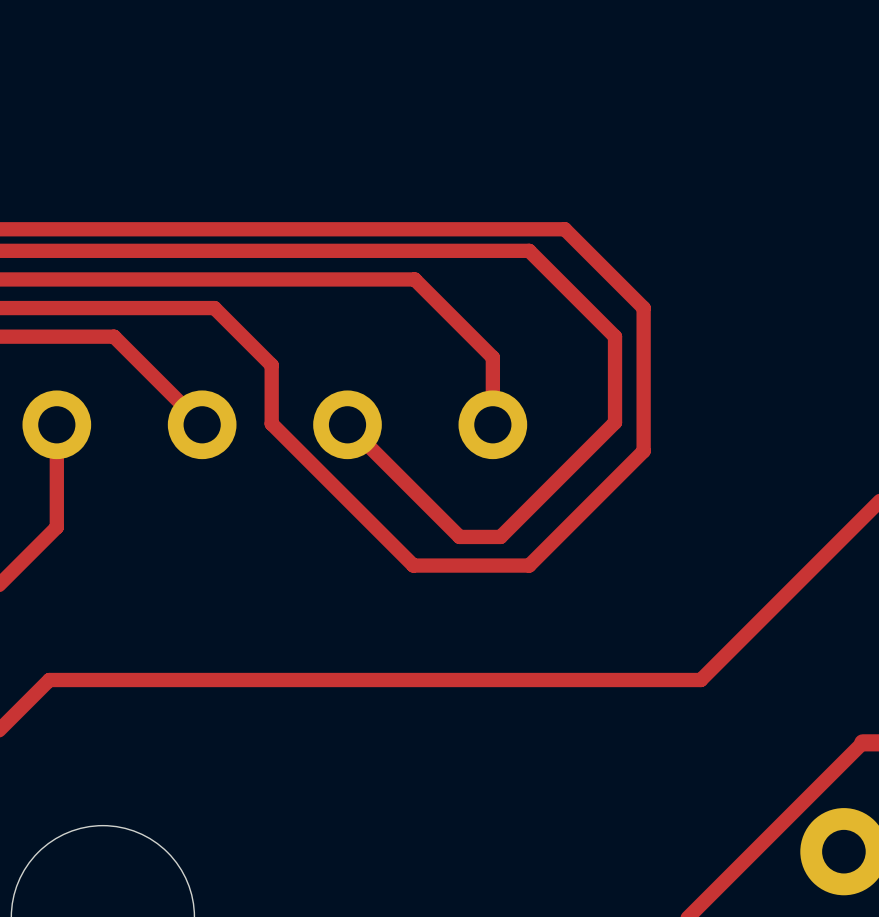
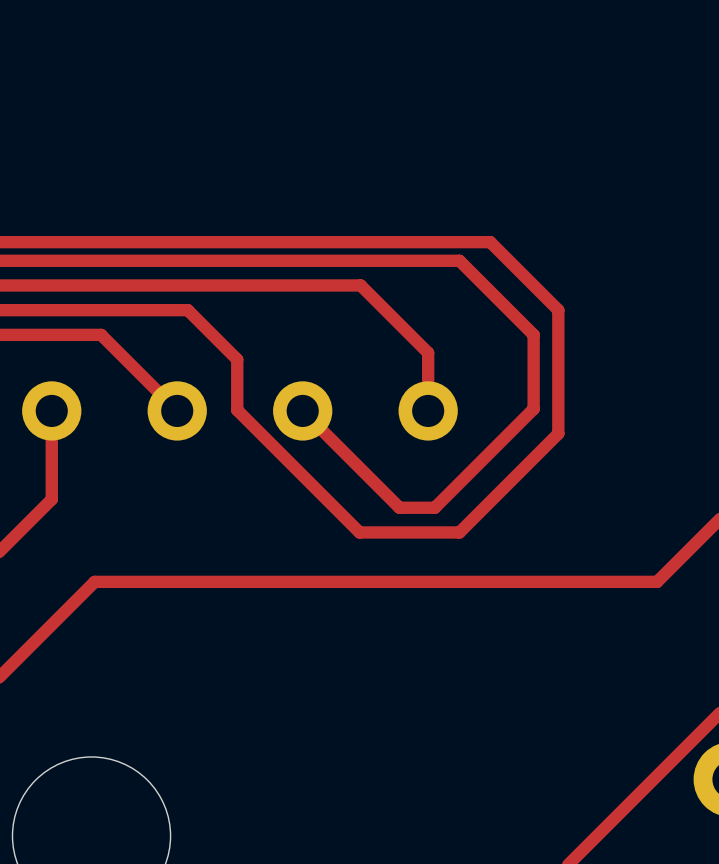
top track: (758, 622) (700, 680) (49, 680) -> (657, 581) (94, 581) (45, 631)

